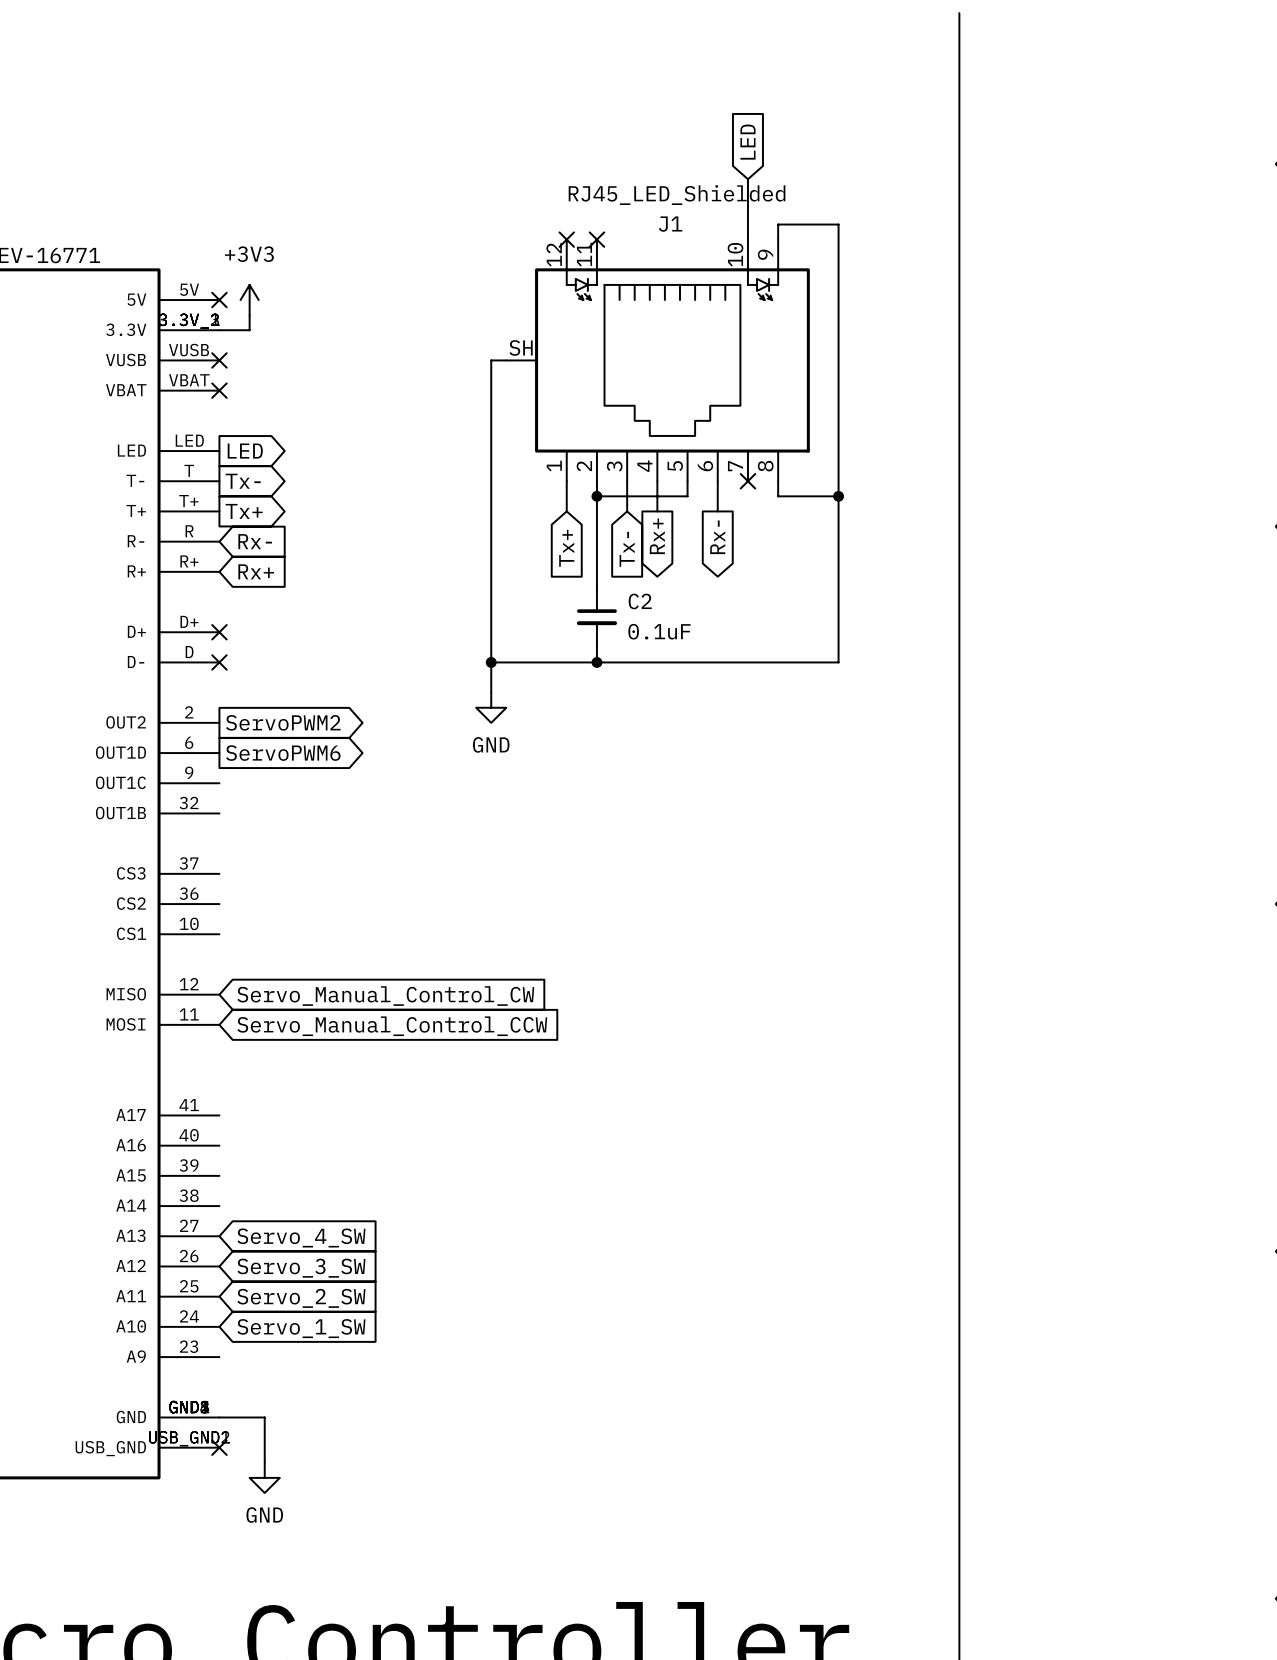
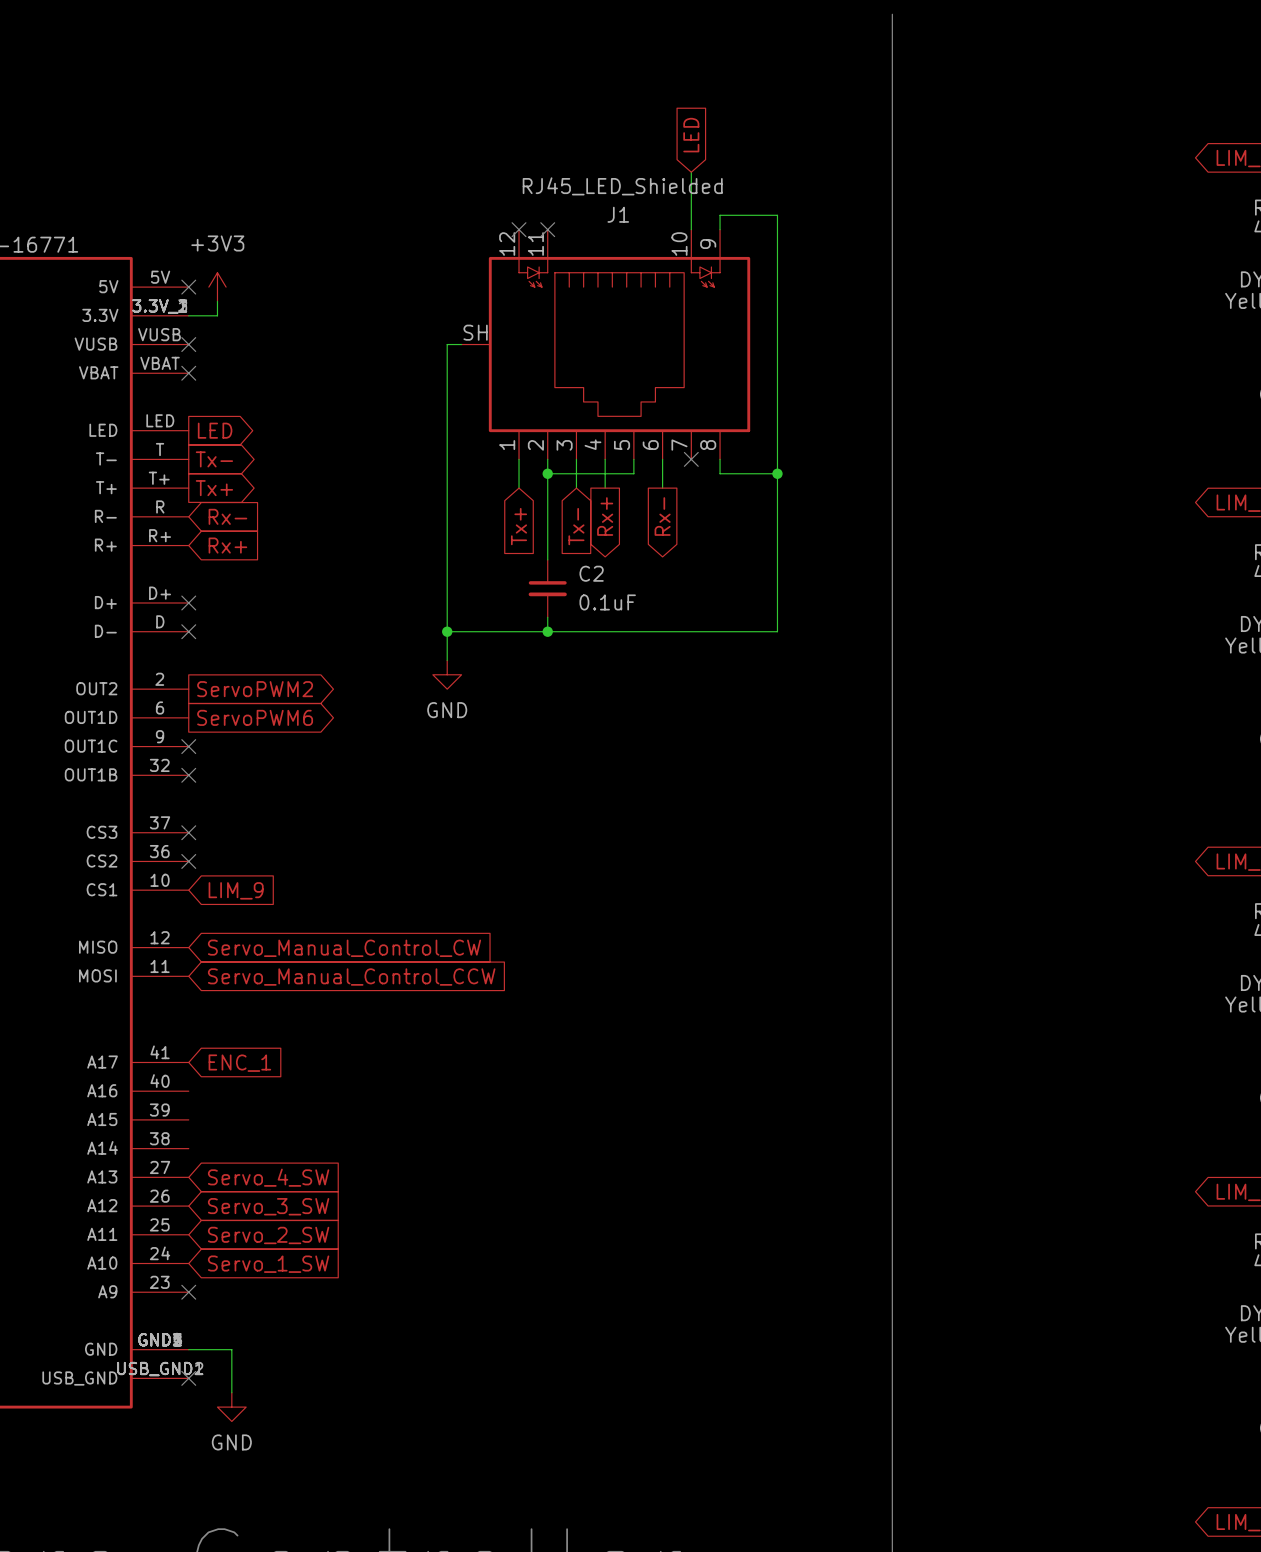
no-connect mark: none -> (188, 746)
no-connect mark: none -> (188, 775)
no-connect mark: none -> (188, 832)
no-connect mark: none -> (188, 861)
global label: none -> LIM_9 (236, 890)
global label: none -> ENC_1 (239, 1063)
no-connect mark: none -> (188, 1292)

